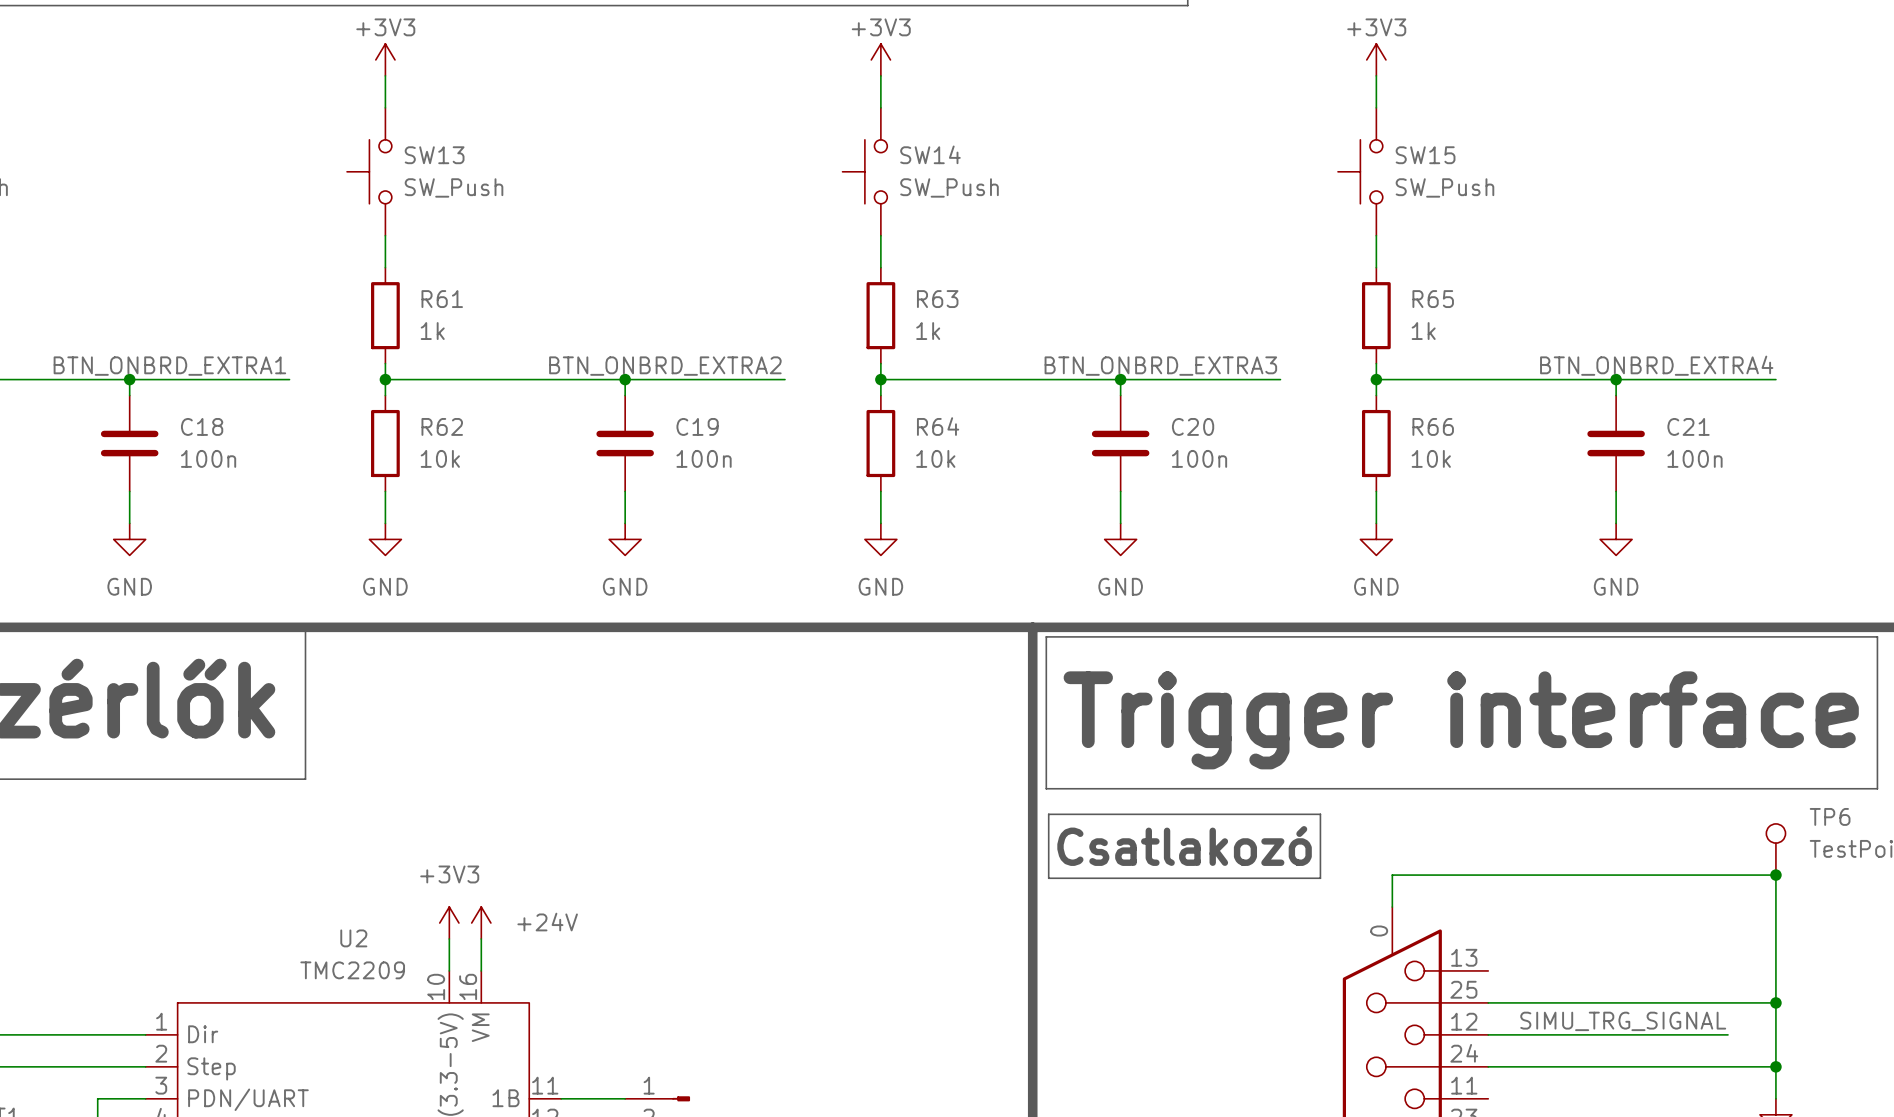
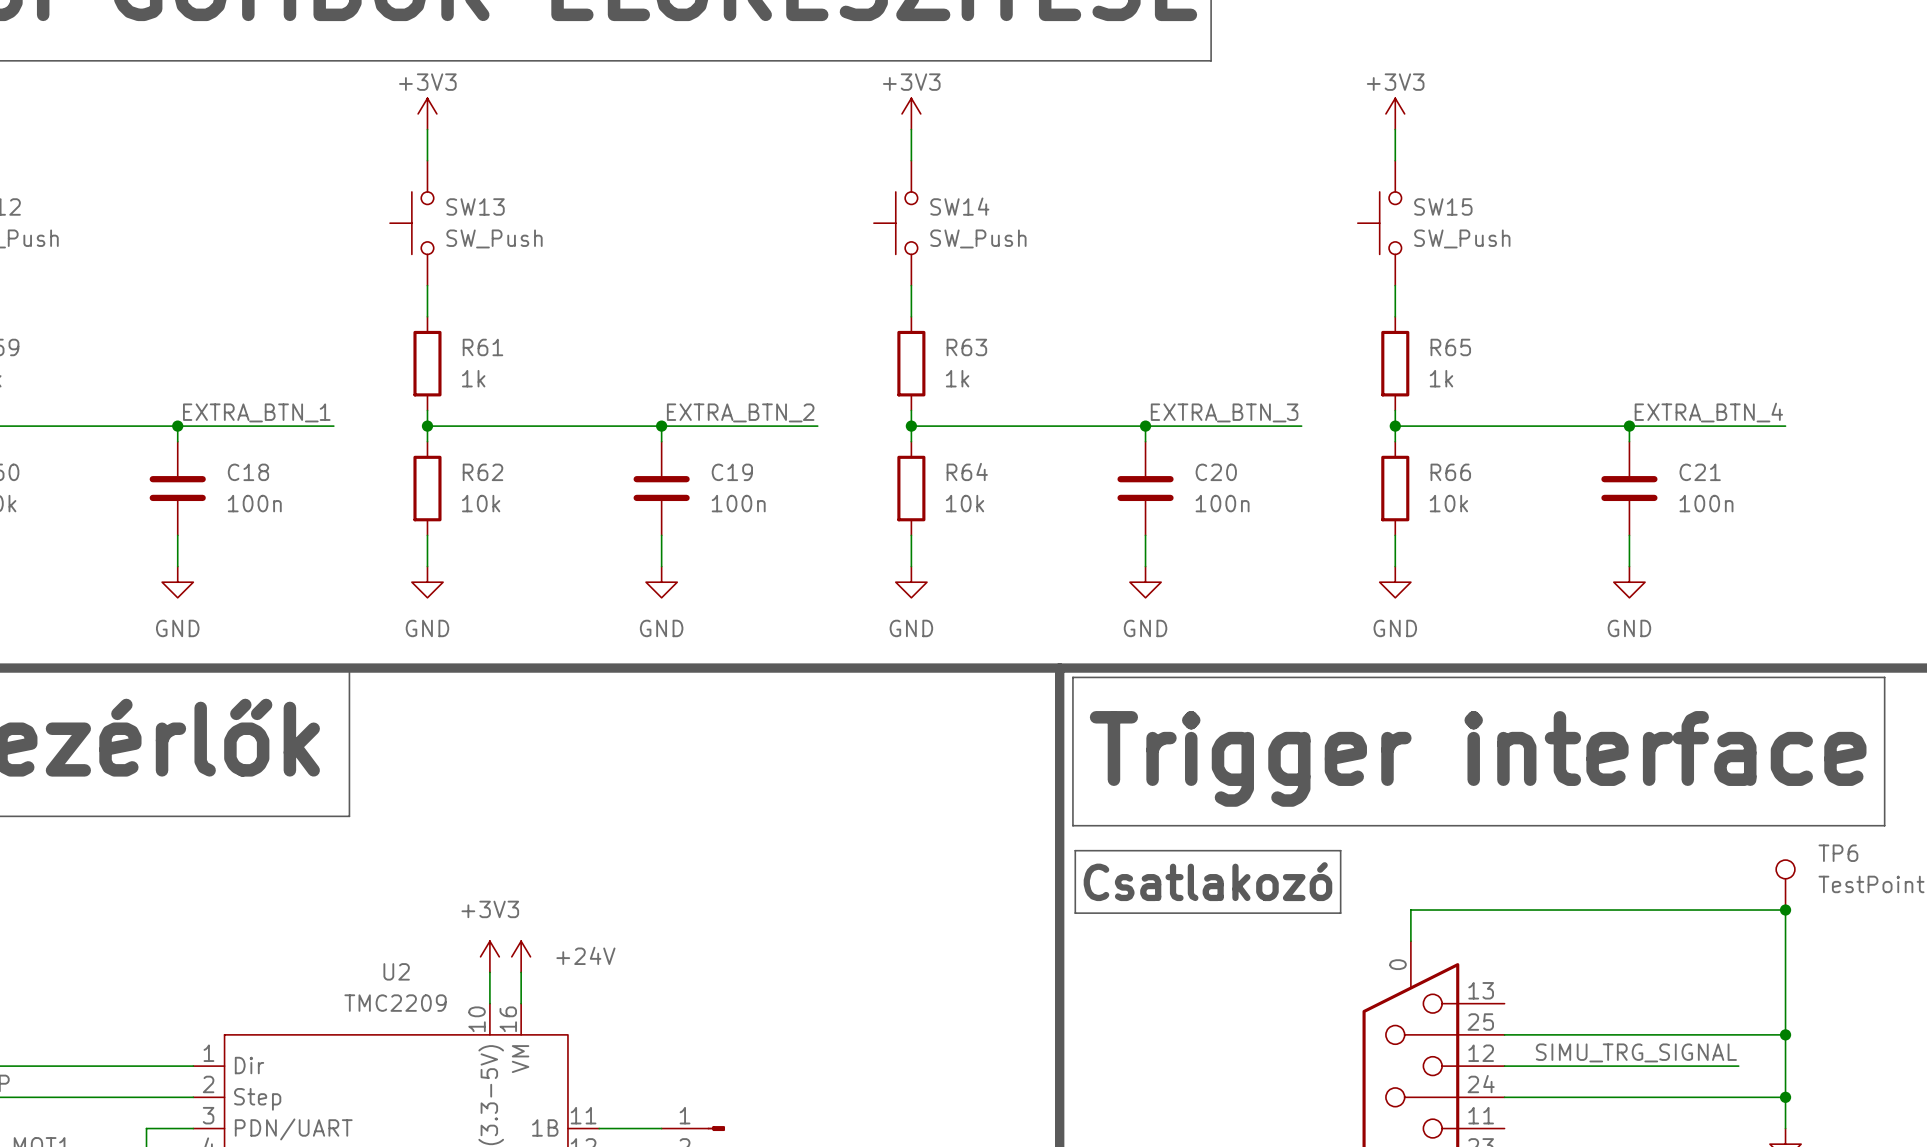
label: BTN_ONBRD_EXTRA4 (1656, 365) -> EXTRA_BTN_4 (1708, 412)
label: BTN_ONBRD_EXTRA1 (169, 366) -> EXTRA_BTN_1 (256, 412)
label: BTN_ONBRD_EXTRA2 (665, 366) -> EXTRA_BTN_2 (740, 412)
label: BTN_ONBRD_EXTRA3 (1160, 366) -> EXTRA_BTN_3 (1224, 412)

